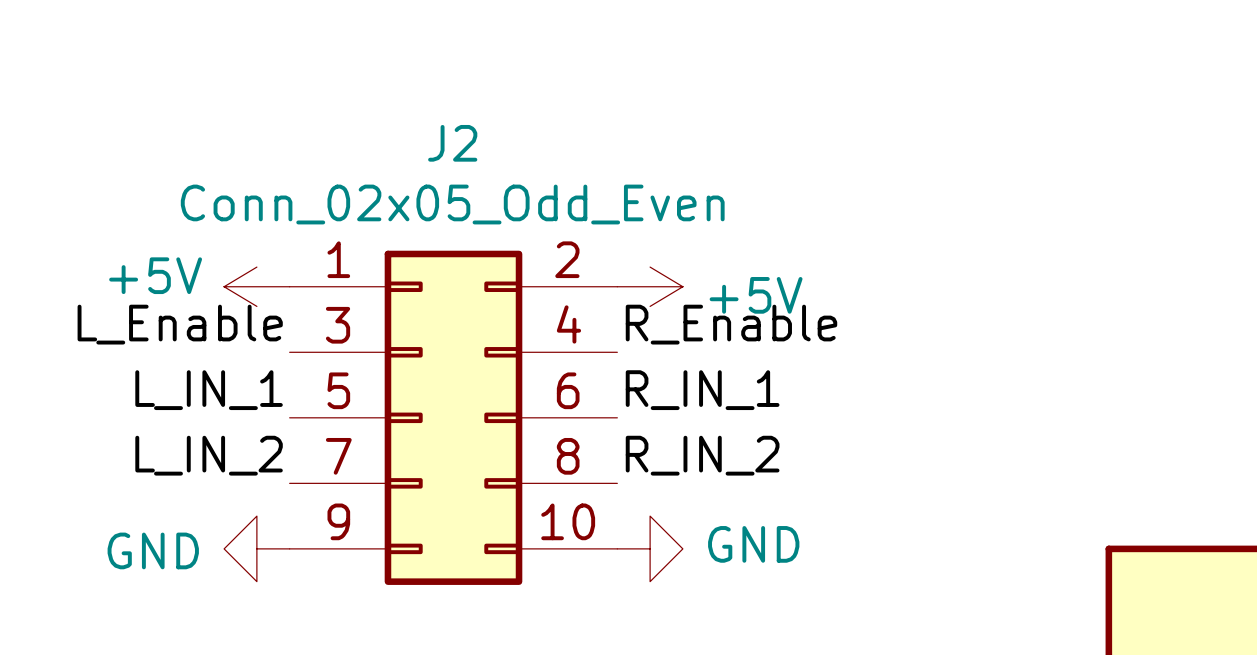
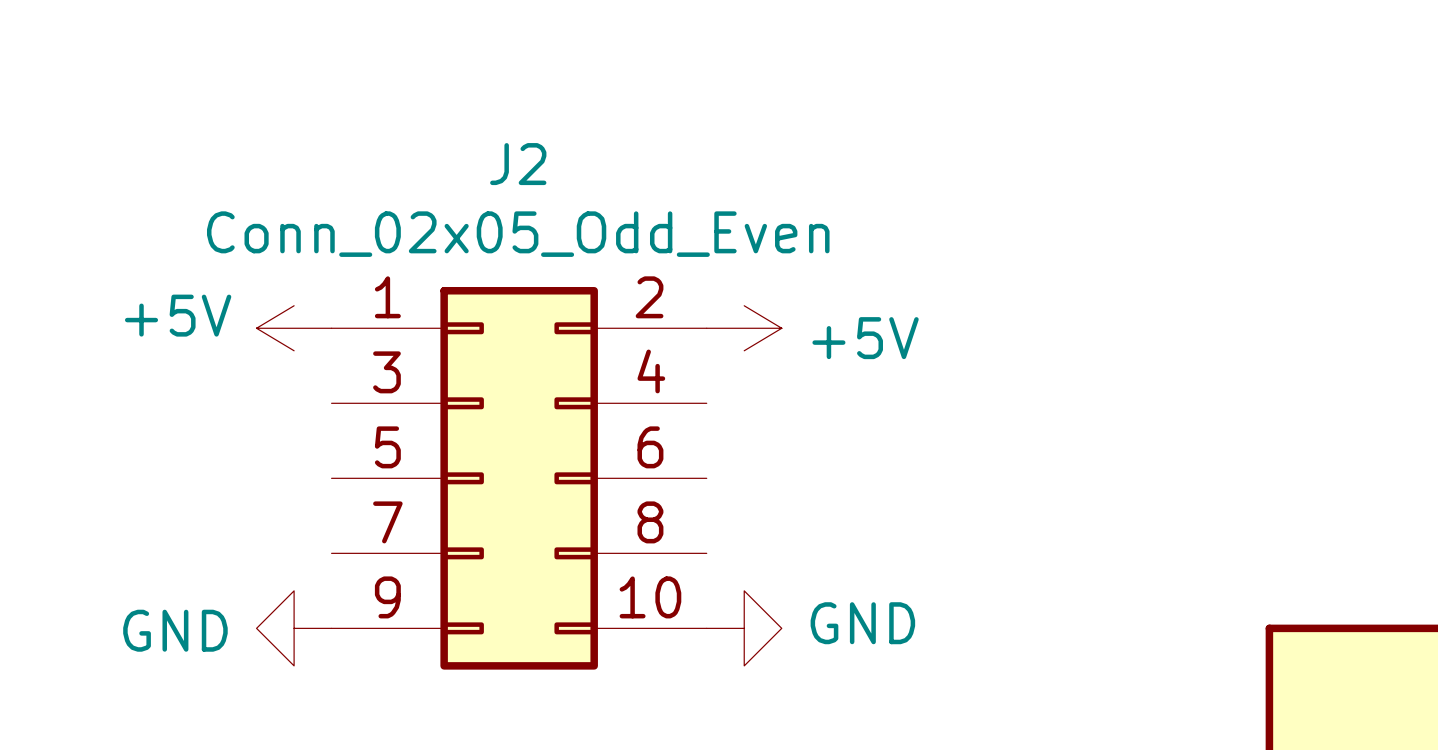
label: L_Enable (180, 324) -> none
label: R_Enable (731, 324) -> none
label: L_IN_1 (209, 390) -> none
label: R_IN_1 (702, 390) -> none
label: L_IN_2 (209, 455) -> none
label: R_IN_2 (702, 455) -> none

